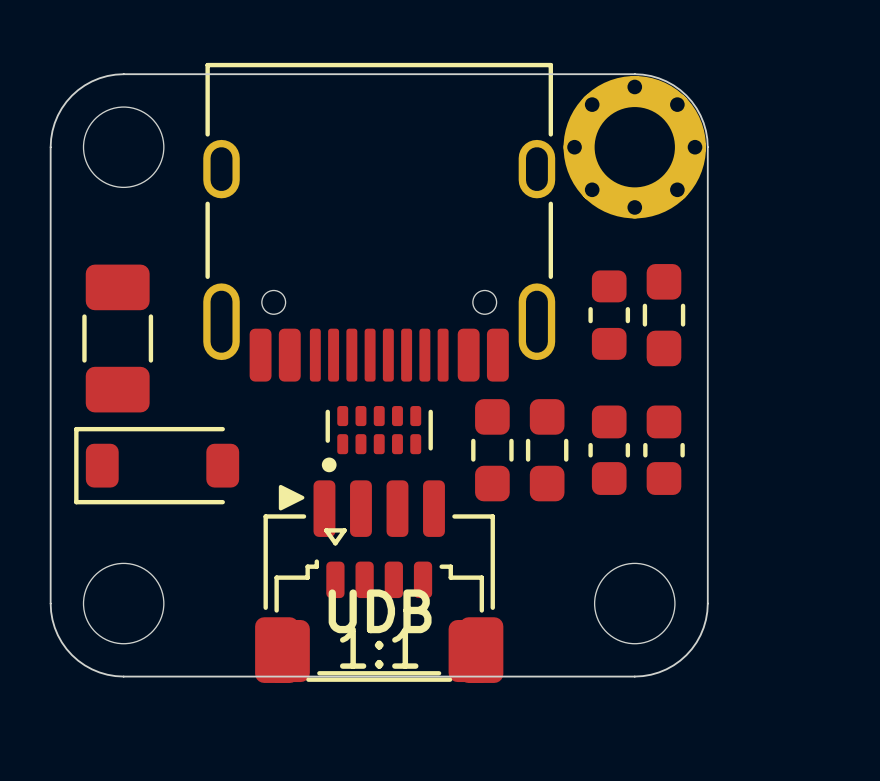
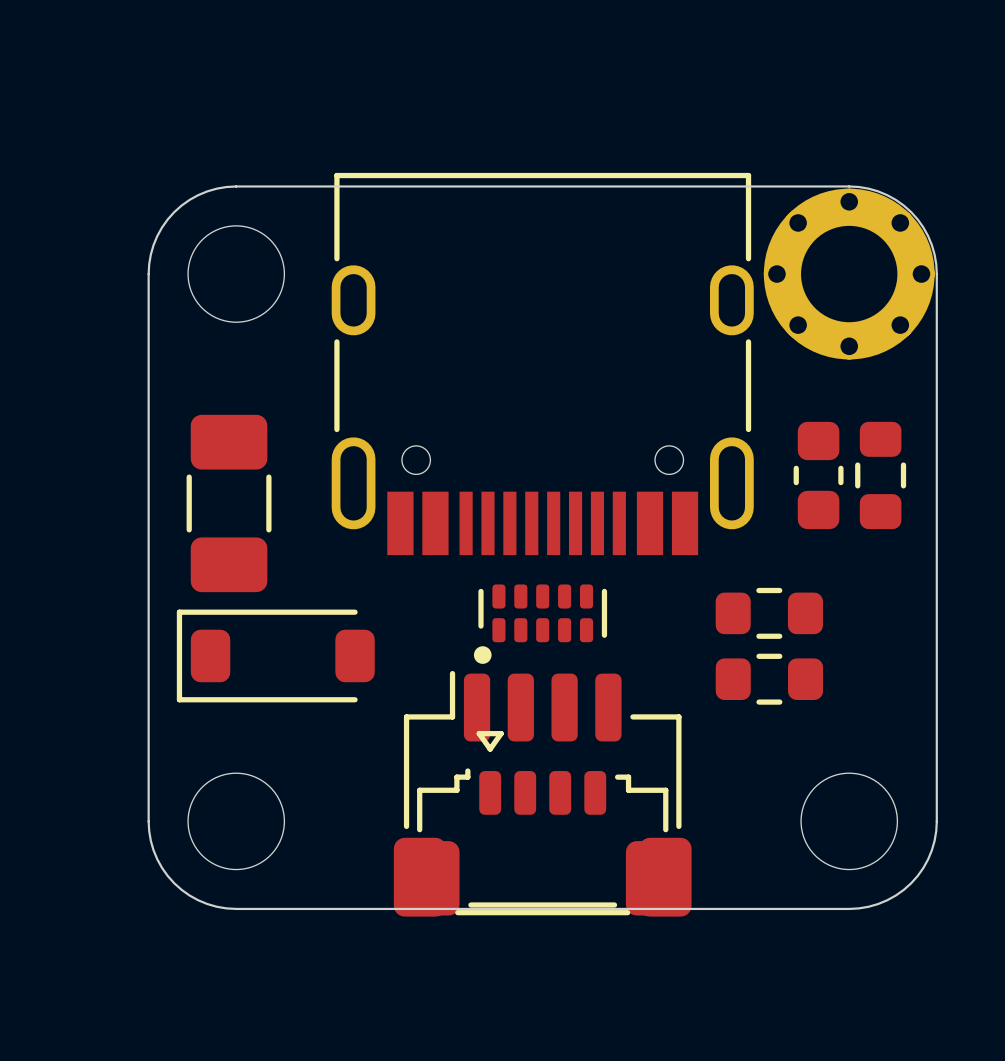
part footprint: [203, 62, 556, 382] -> [331, 172, 754, 556]
part footprint: [642, 264, 686, 367] -> [855, 421, 907, 530]
part: none -> (769, 613)
part: (492, 450) -> none
part: (547, 450) -> none
part: (609, 450) -> none
part: (663, 450) -> none
part footprint: [255, 480, 504, 683] -> [393, 670, 692, 917]
part: none -> (769, 679)

